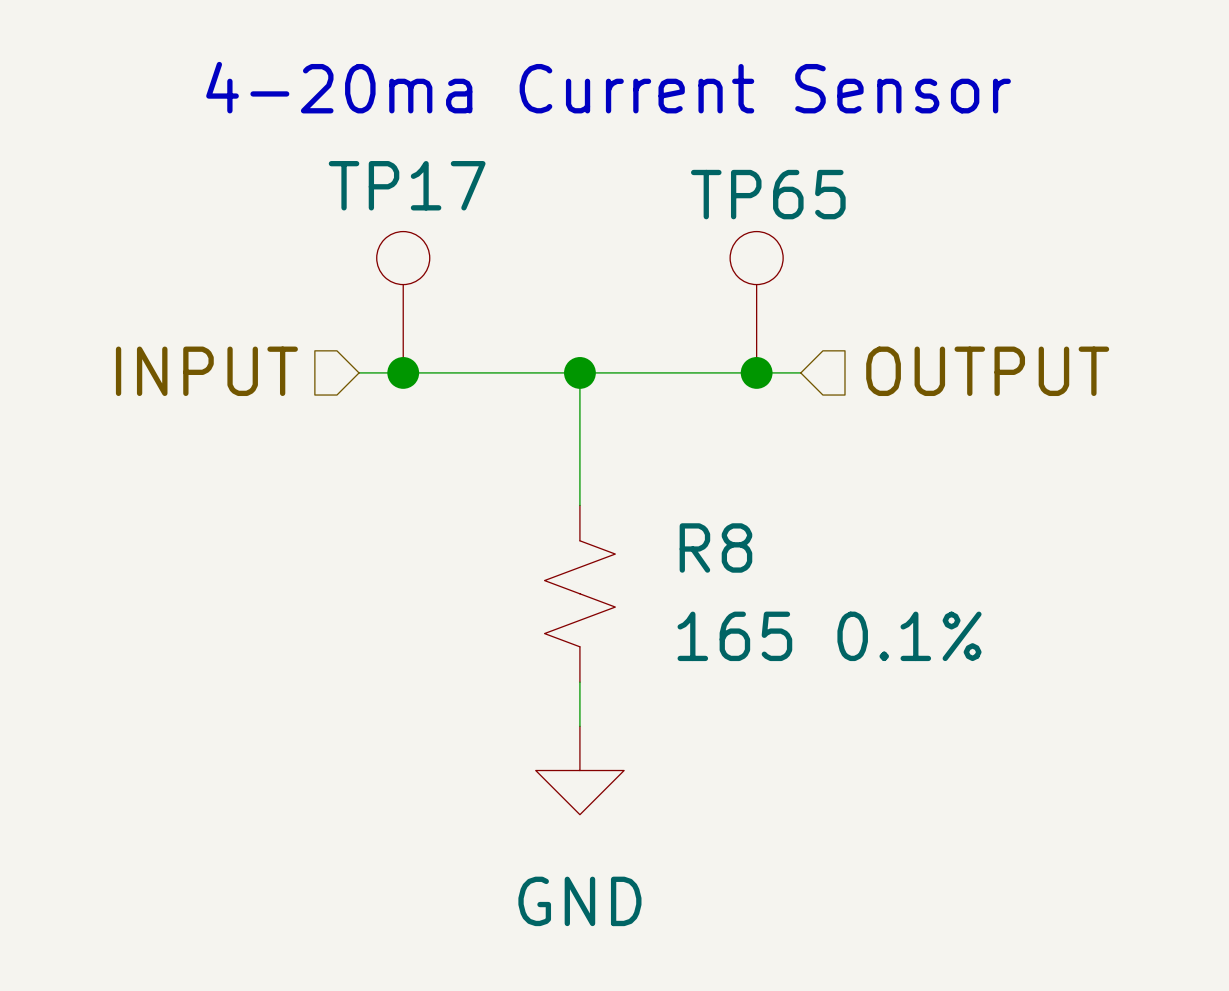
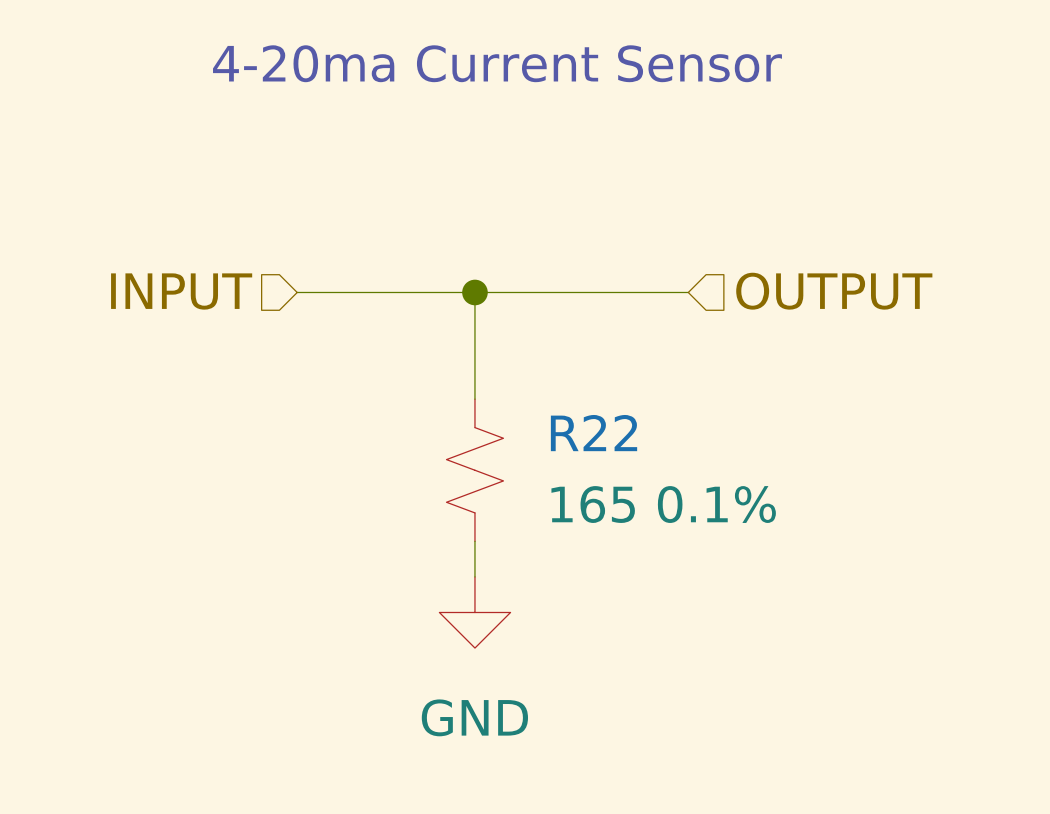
TP17: (403, 302) -> none
TP65: (756, 302) -> none
hierarchical label position: OUTPUT (987, 371) -> OUTPUT (834, 291)
junction: (403, 372) -> none
junction: (756, 372) -> none
wire: none -> (652, 292) (688, 292)
R8 name: R8 (715, 547) -> R22 (594, 433)

